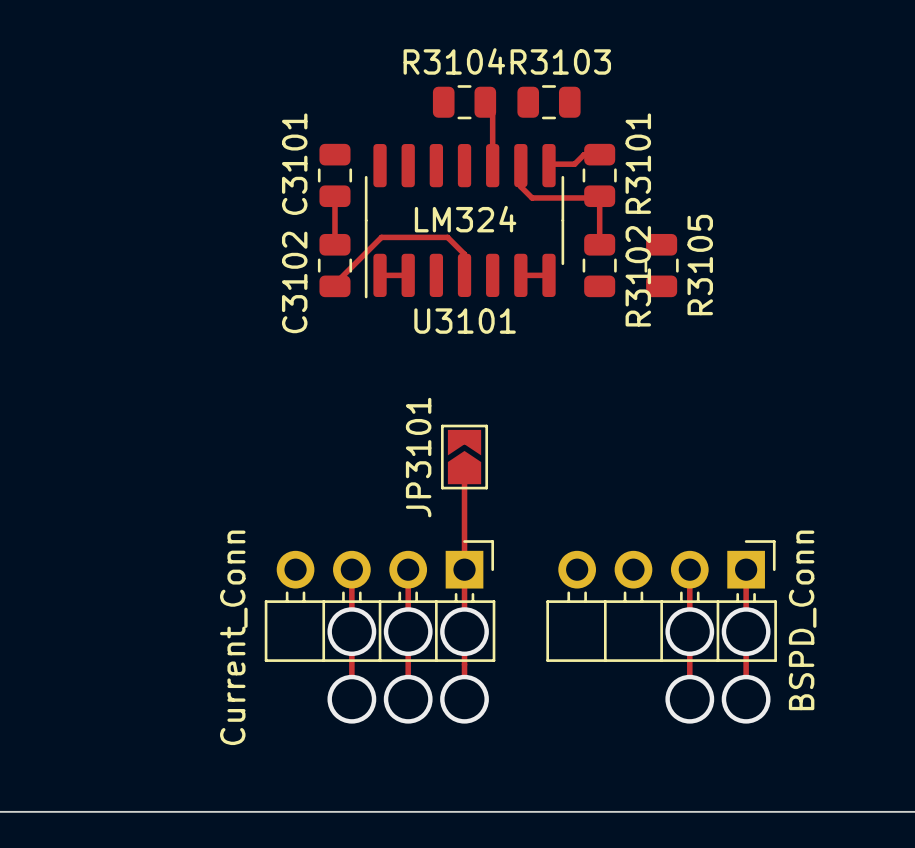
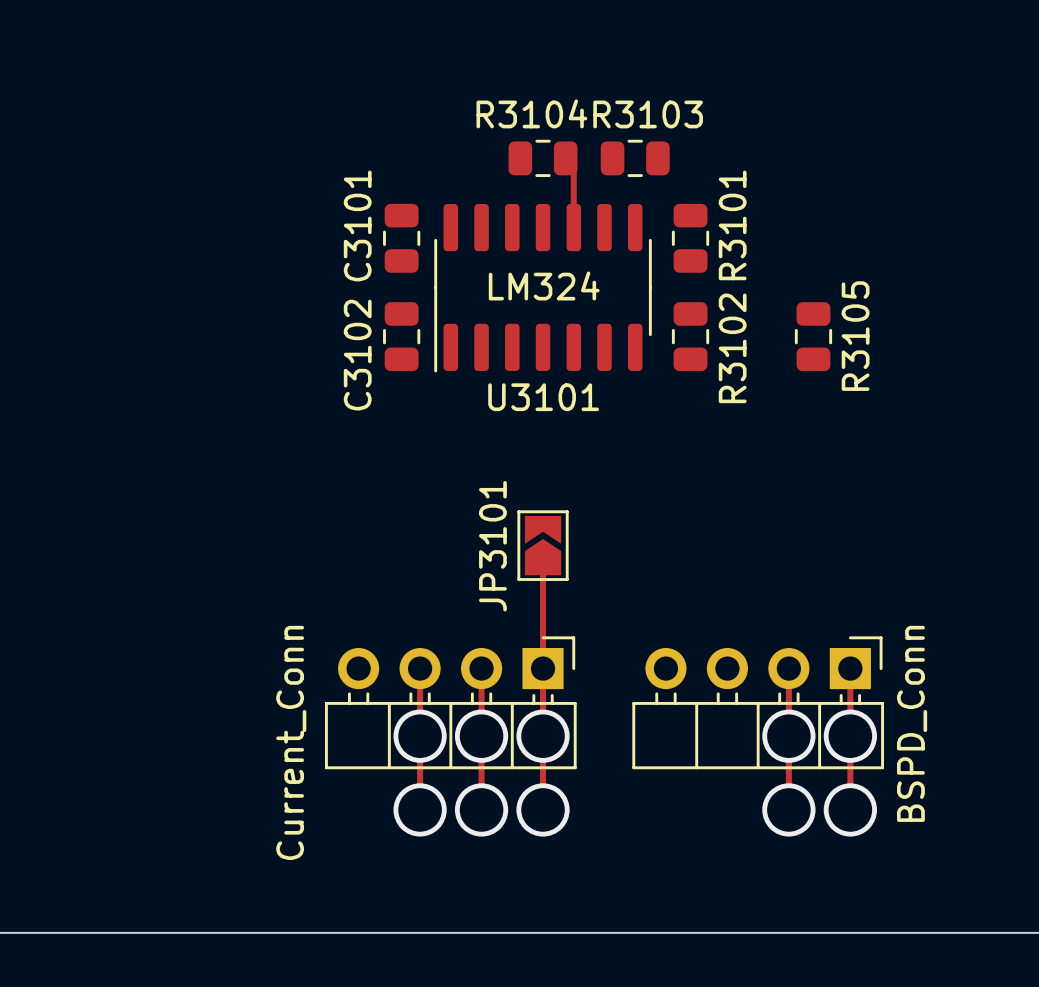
top track: (599, 154) (584, 154) (574, 164) (549, 164) -> none
top track: (520, 165) (520, 186) (532, 197) (599, 197) -> none
top track: (334, 192) (334, 244) -> none
top track: (599, 196) (599, 244) -> none
R3105 position: (661, 265) -> (813, 336)
top track: (408, 275) (380, 276) -> none
top track: (464, 275) (464, 254) (447, 237) (381, 237) (334, 283) (334, 286) -> none
top track: (520, 275) (549, 276) -> none

